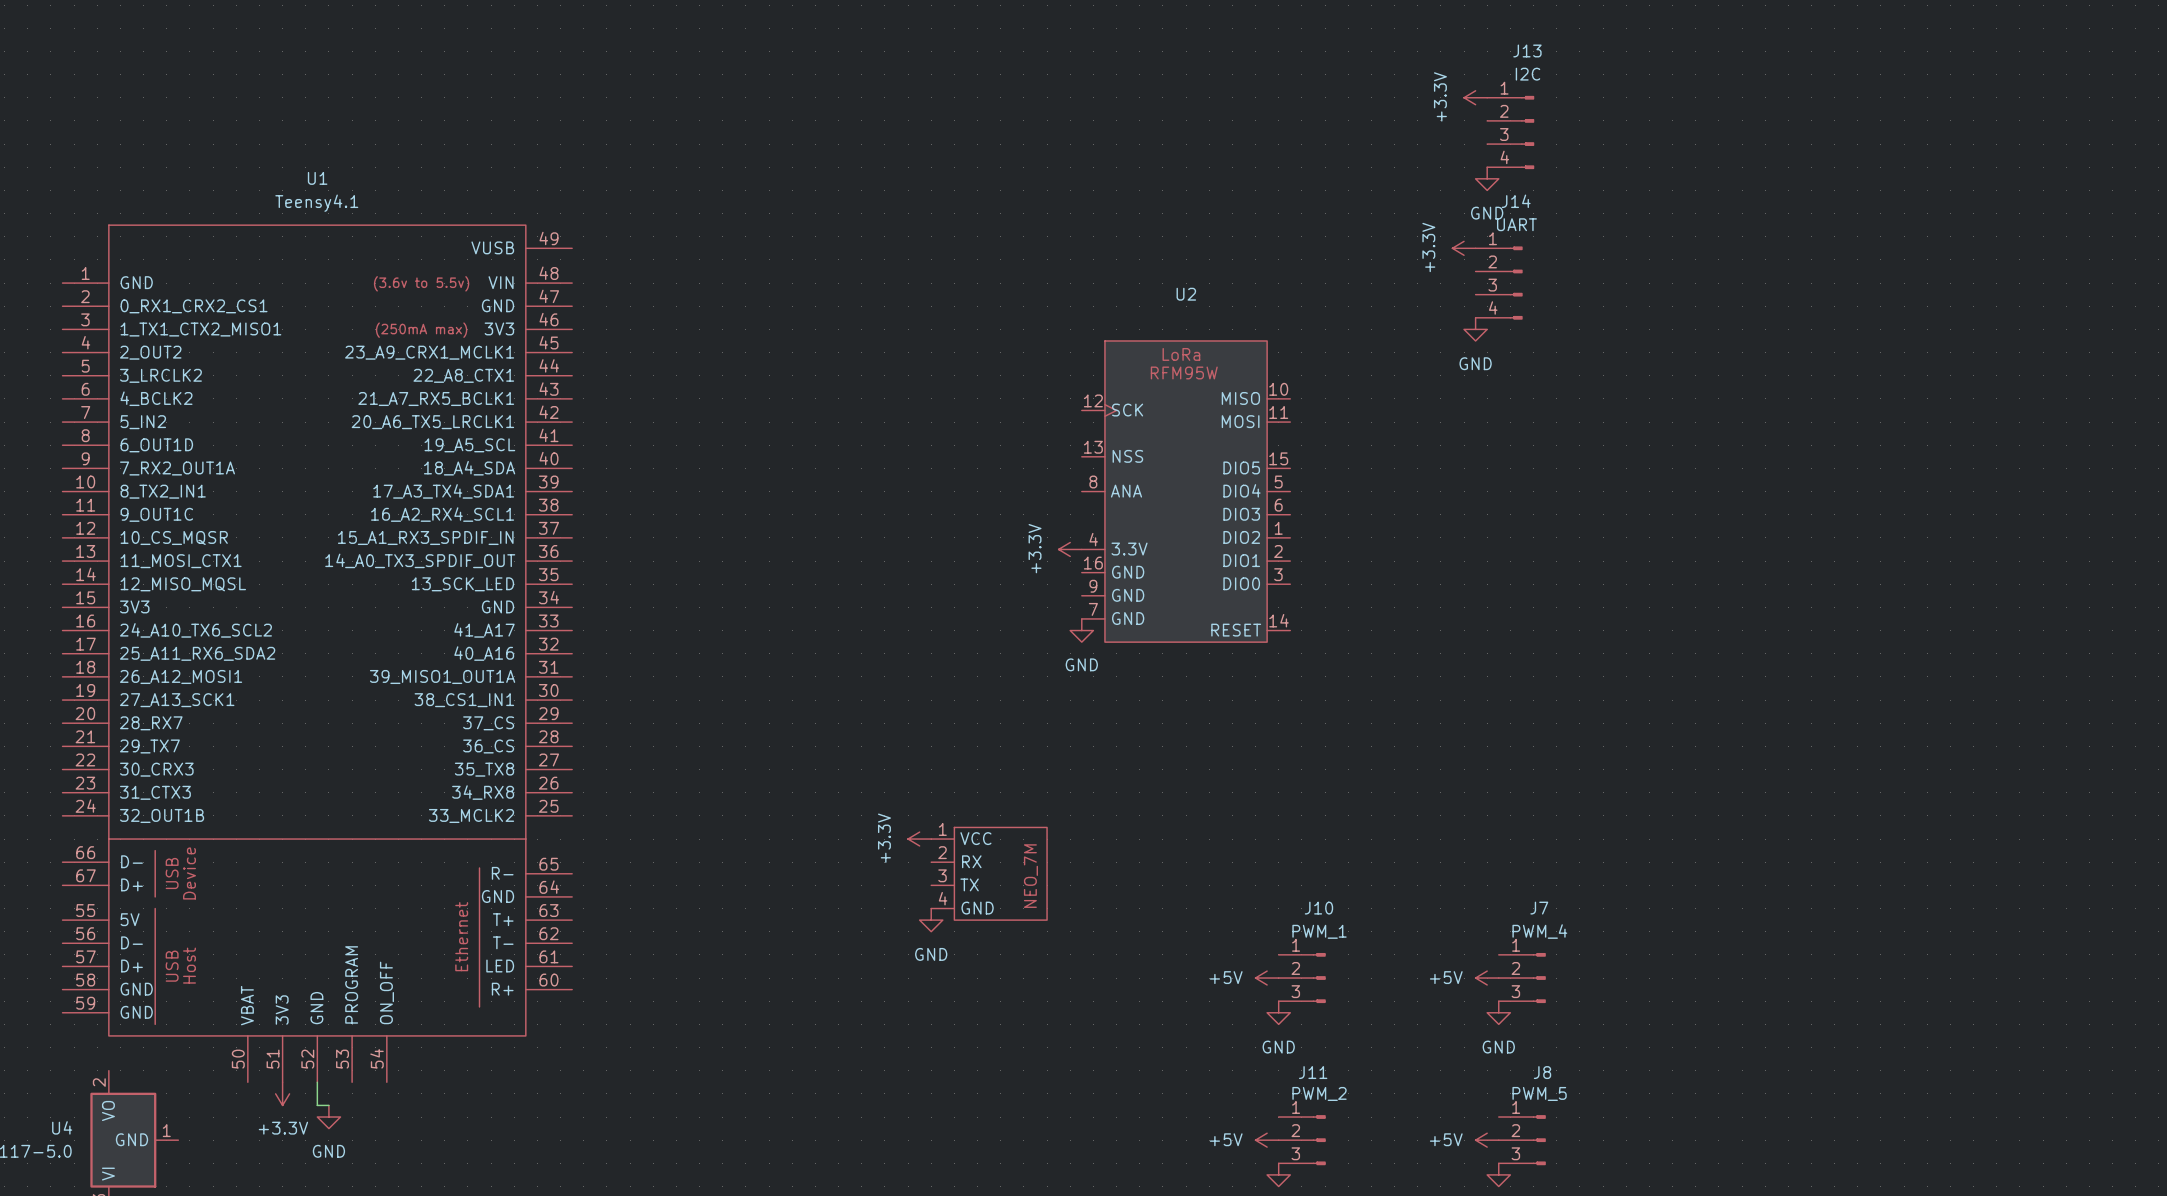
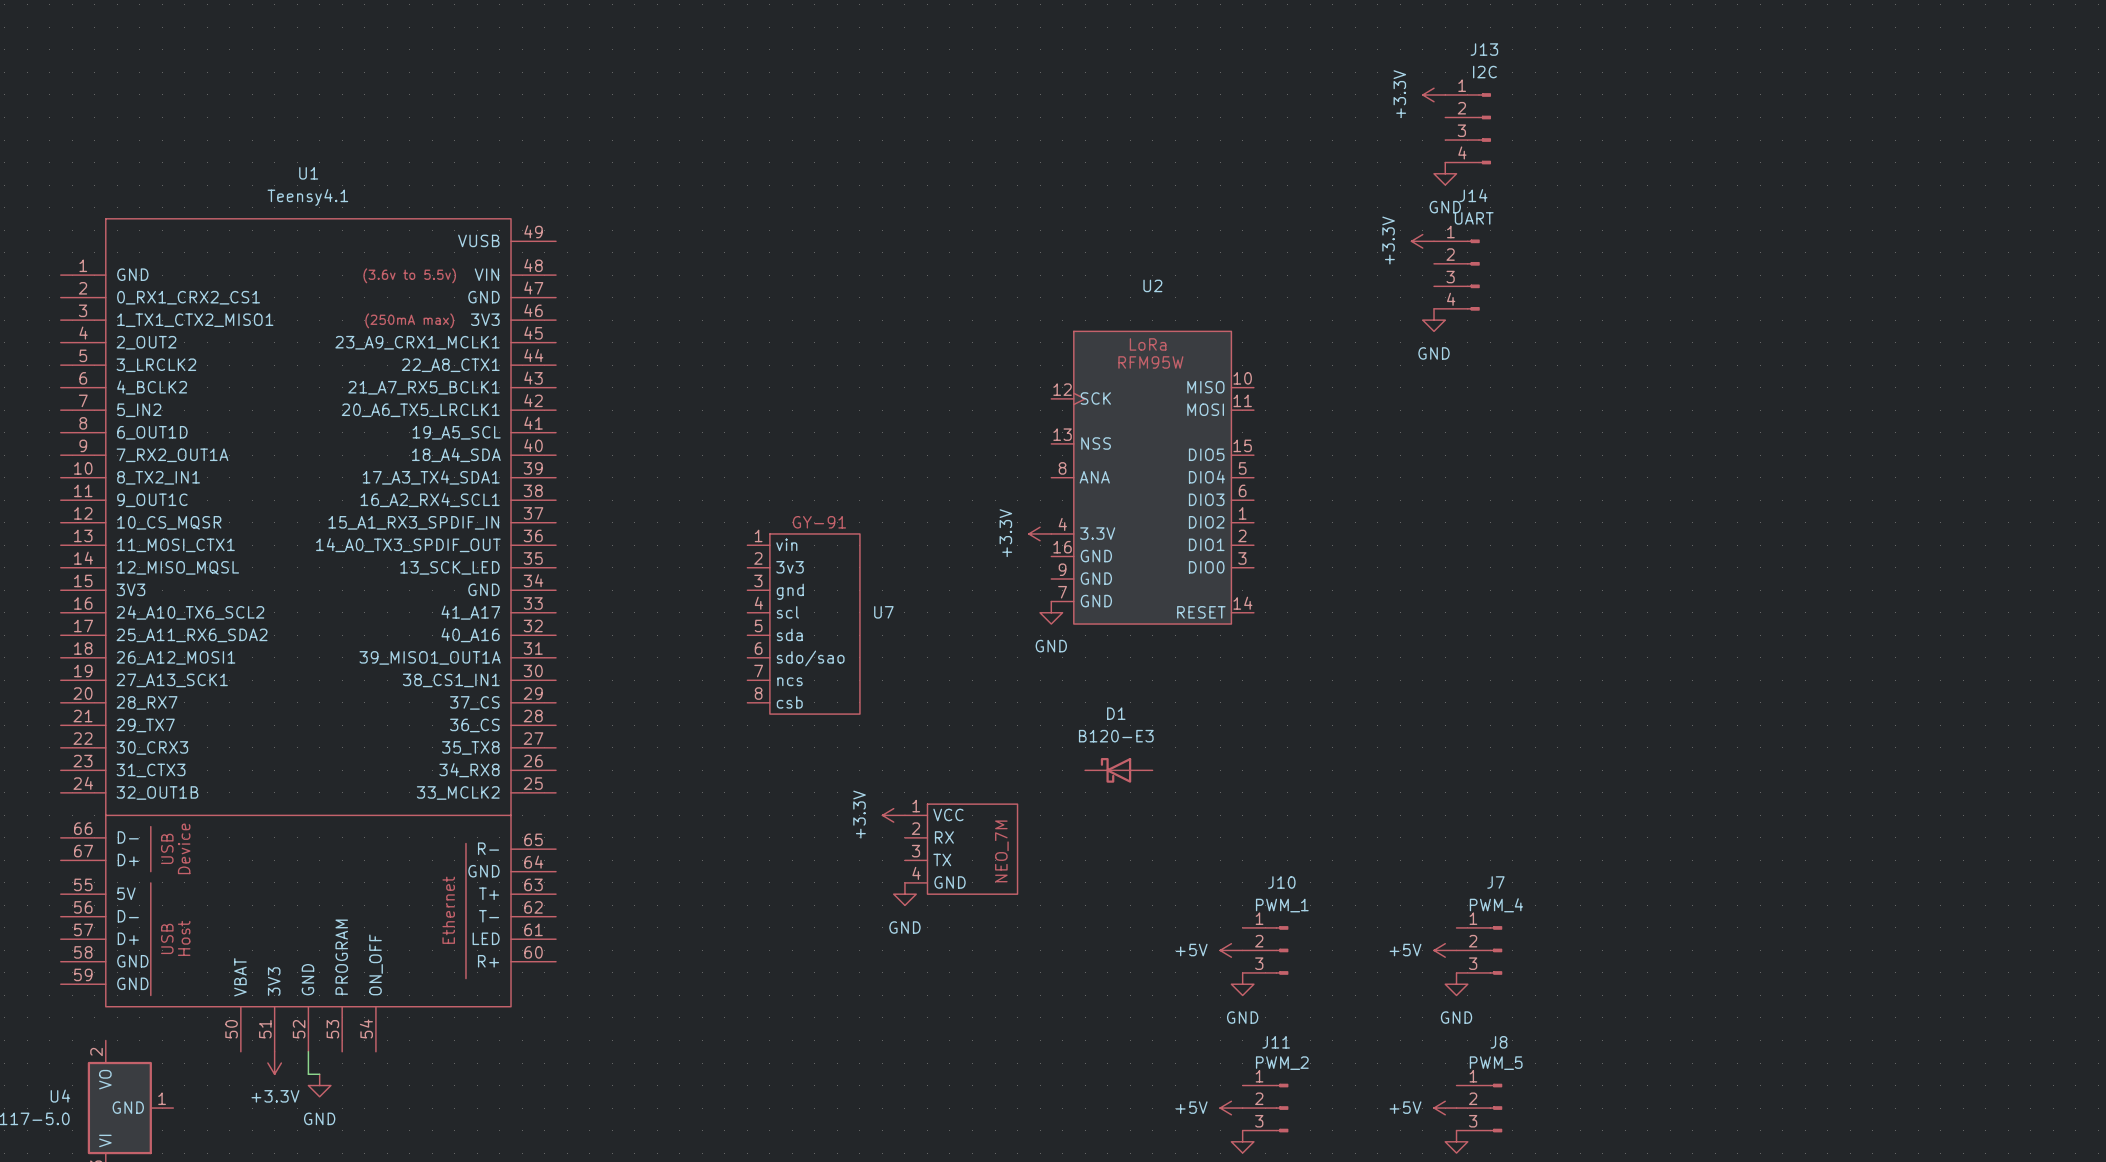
U7: none -> (803, 624)
D1: none -> B120-E3 (1118, 770)

